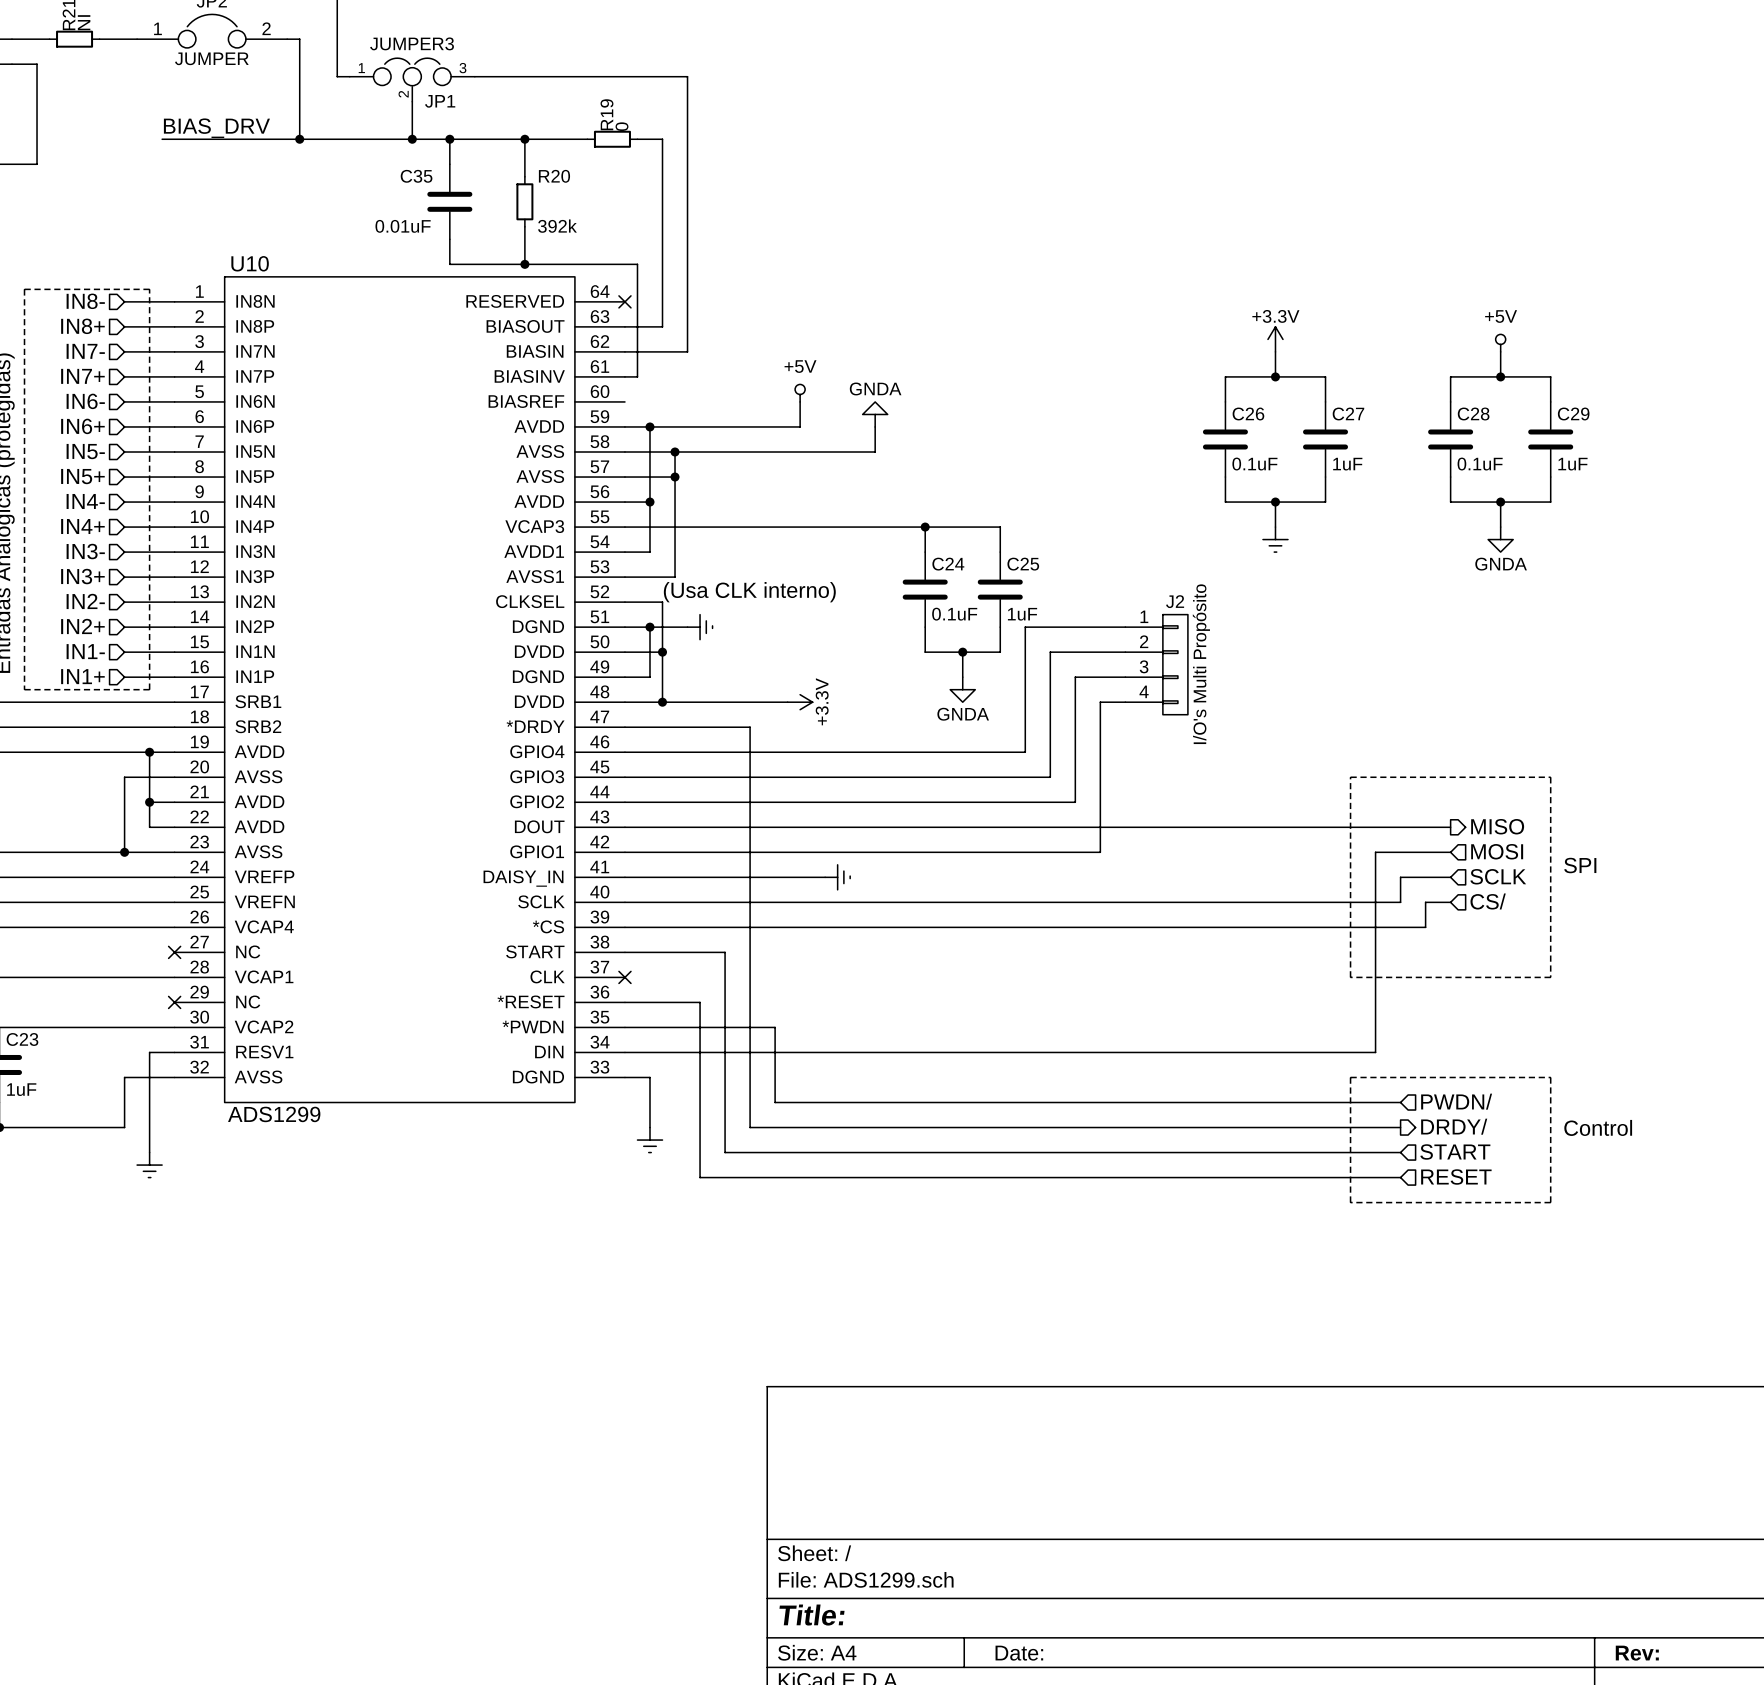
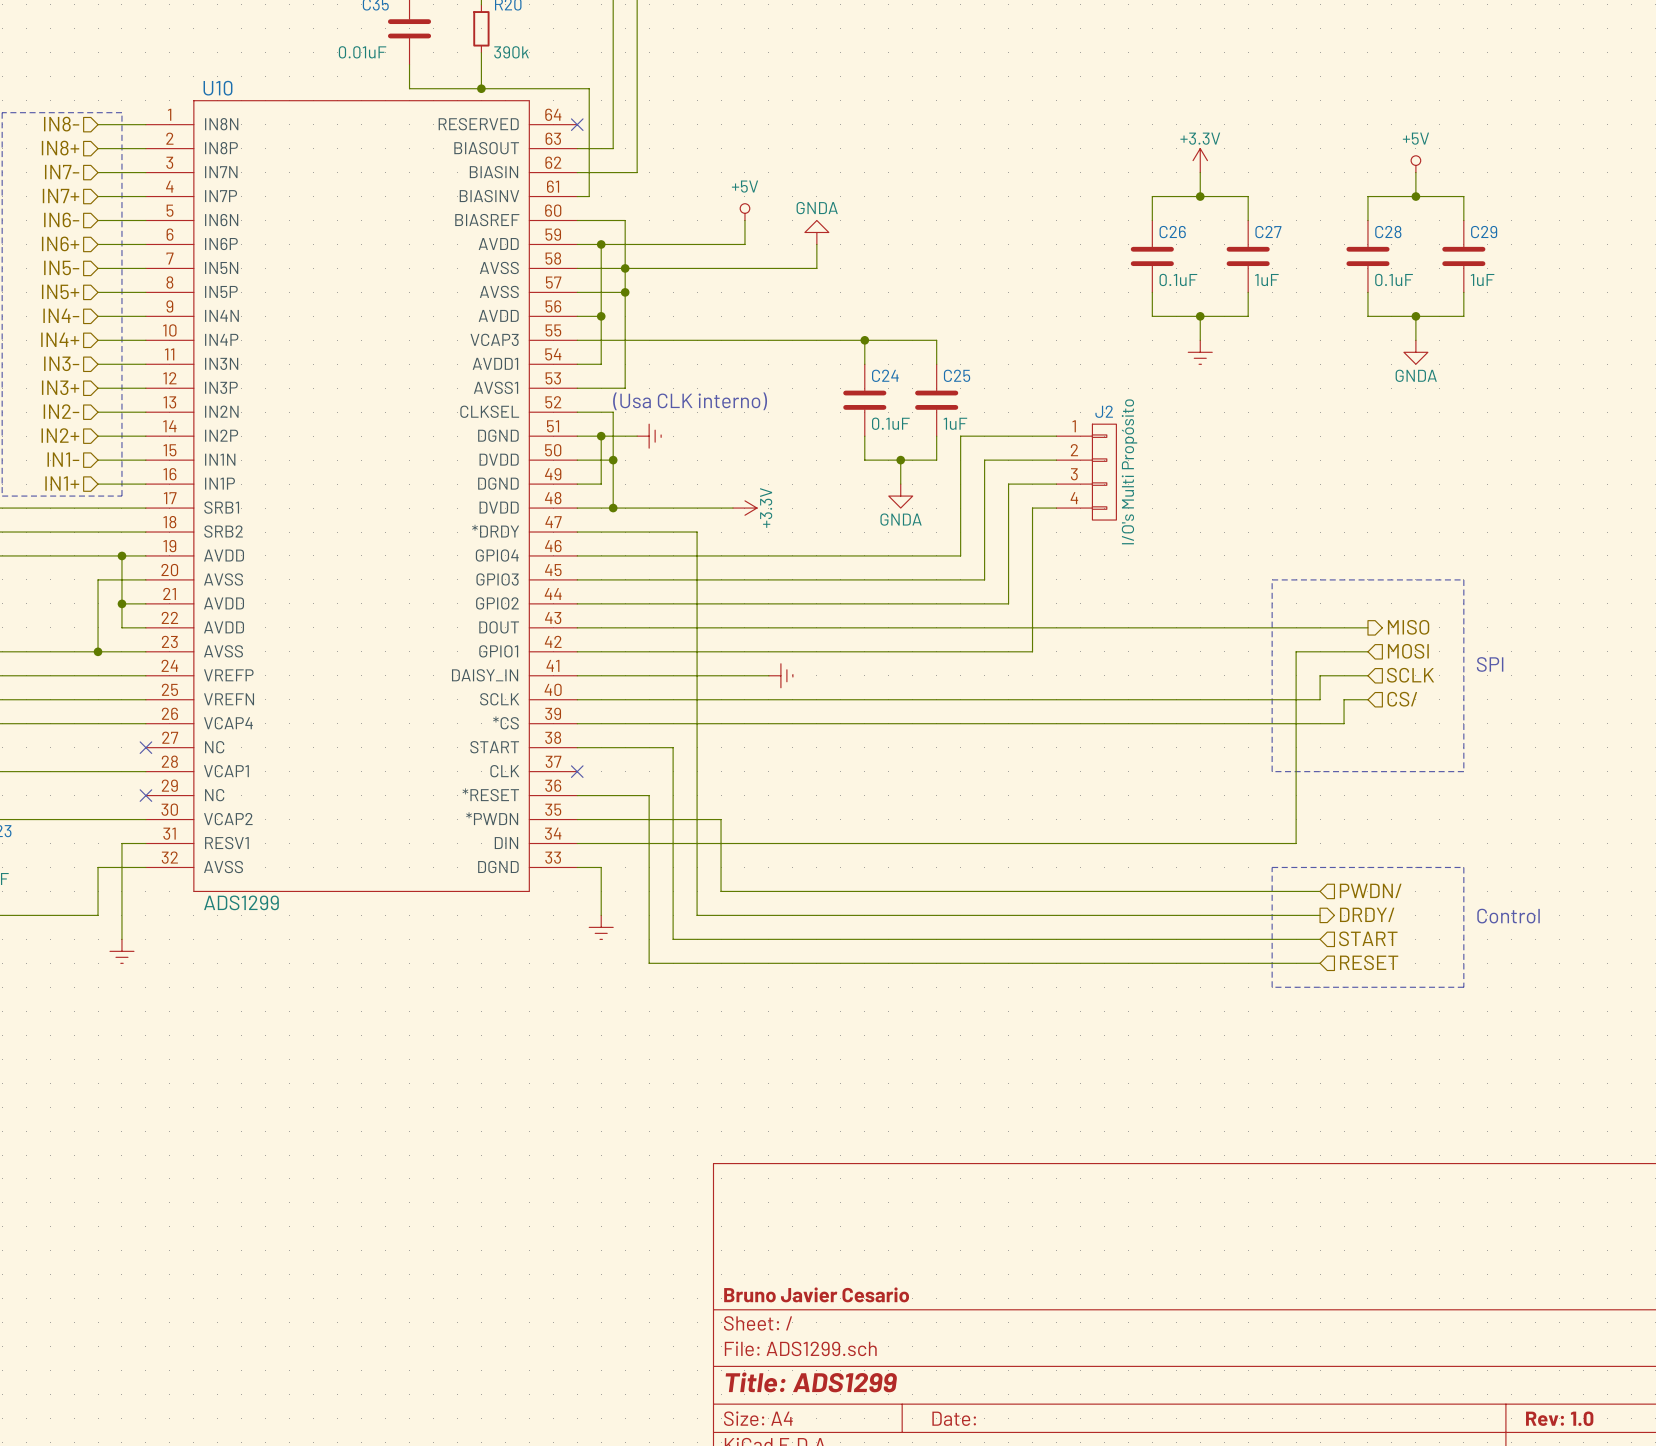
R20 value: 392k (557, 226) -> 390k (511, 52)
wire: none -> (577, 220) (625, 220) (625, 268)
title block: none -> Bruno Javier Cesario (816, 1294)
title block: Title: (812, 1615) -> Title: ADS1299 (811, 1382)
title block: Rev: (1637, 1653) -> Rev: 1.0 (1559, 1418)

